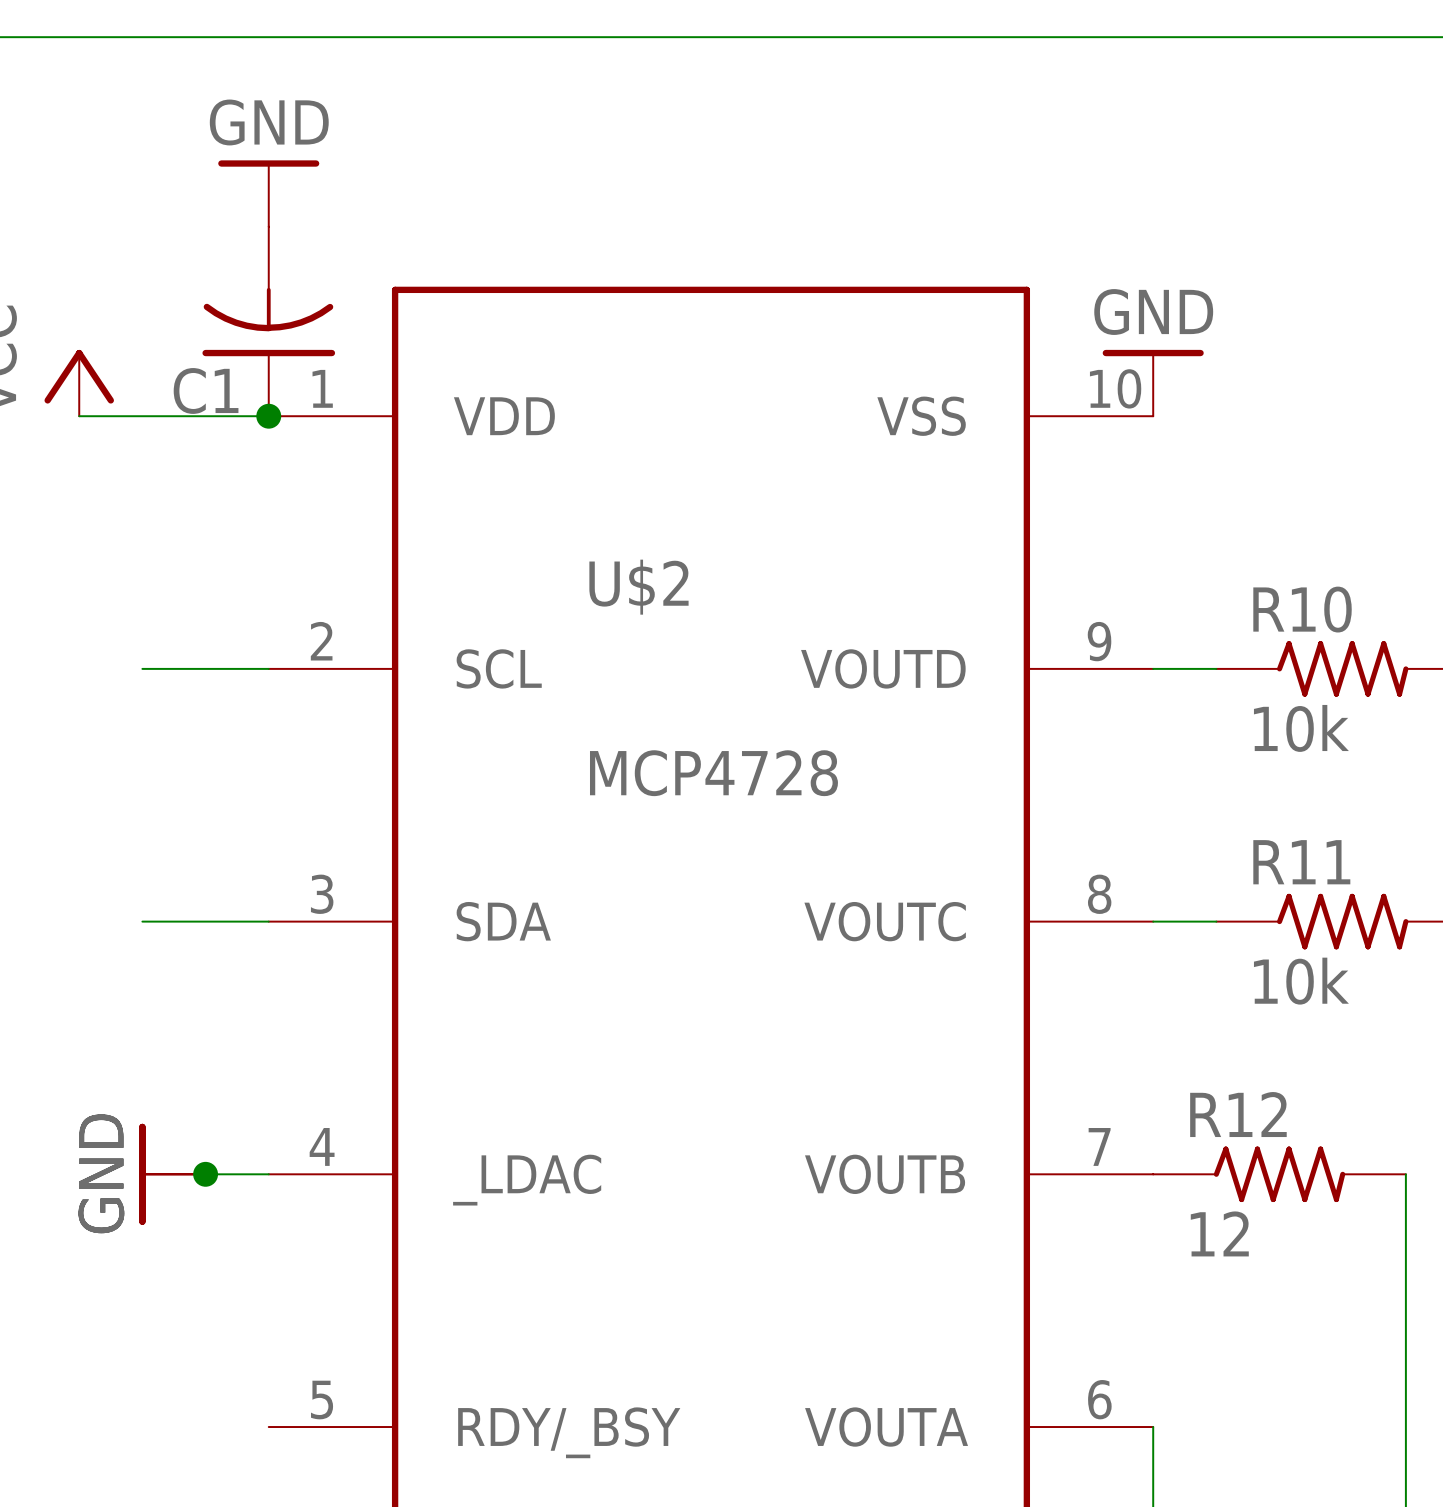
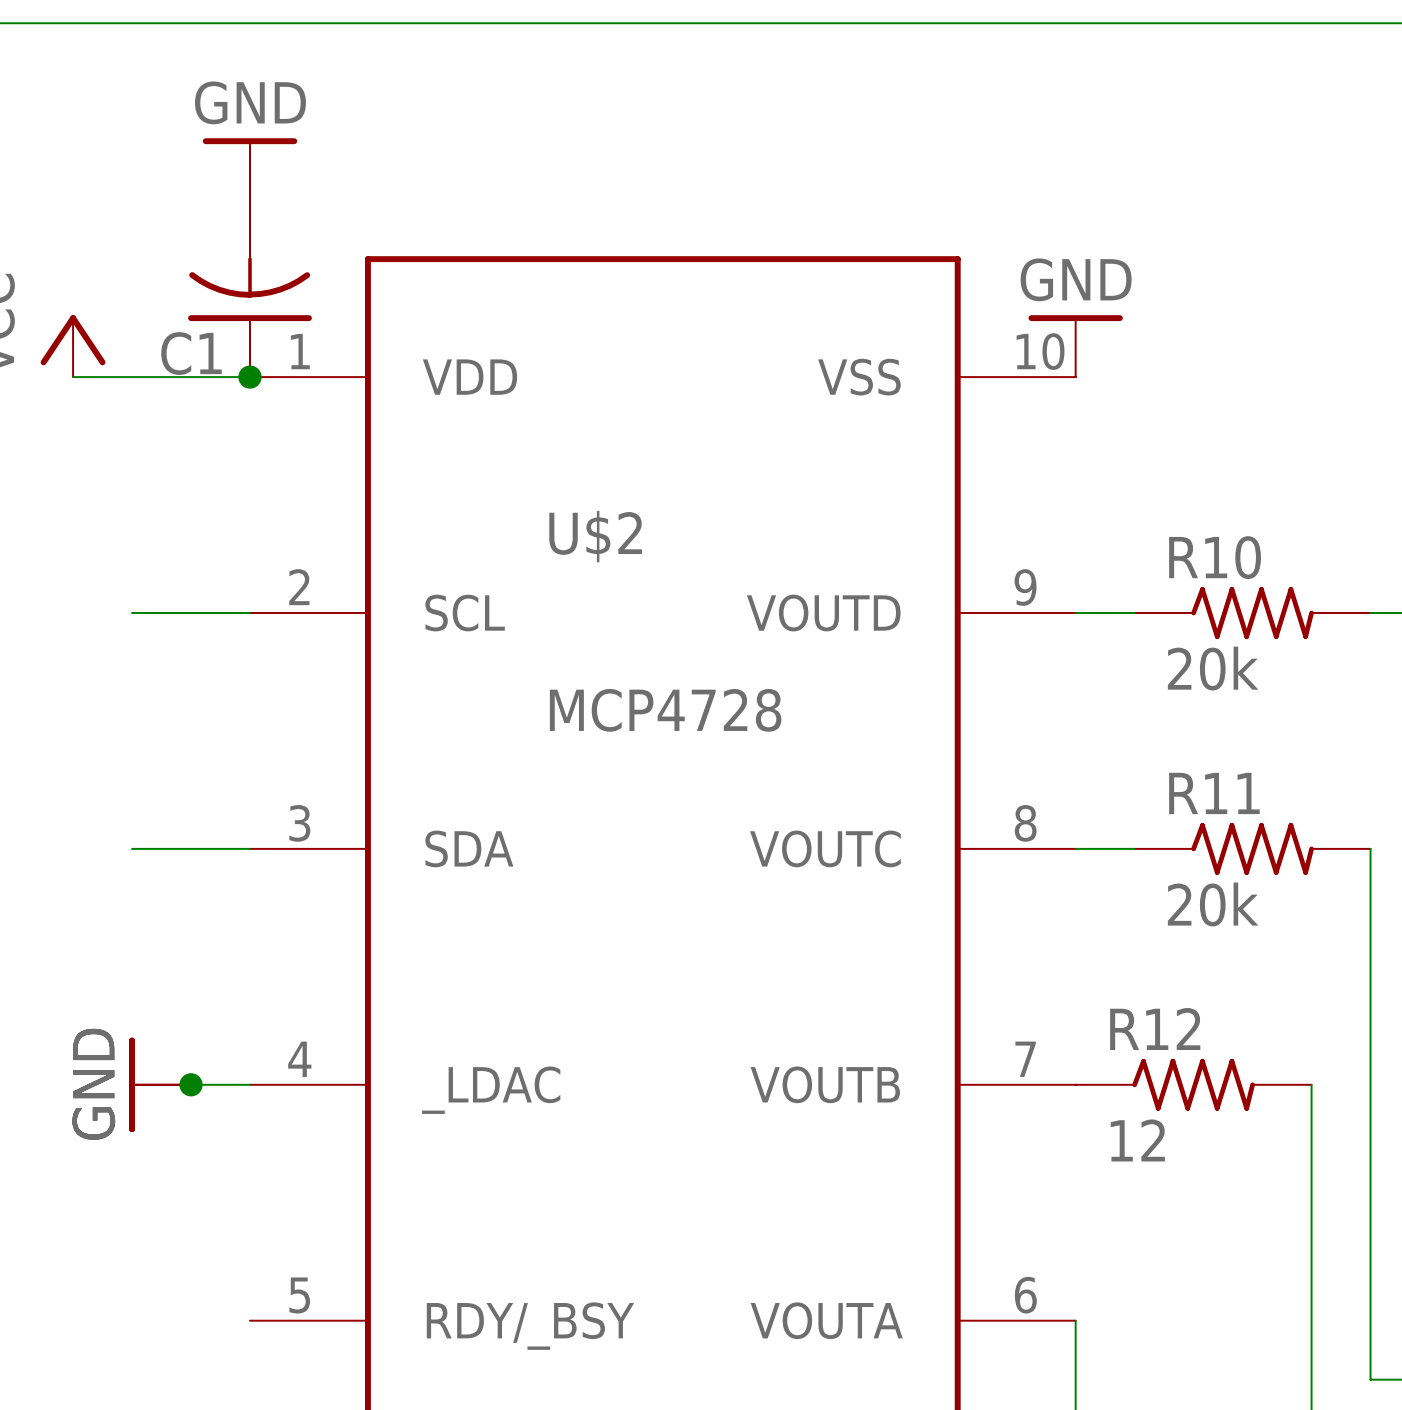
R10 value: 10k (1301, 728) -> 20k (1213, 668)
R11 value: 10k (1301, 981) -> 20k (1213, 904)

